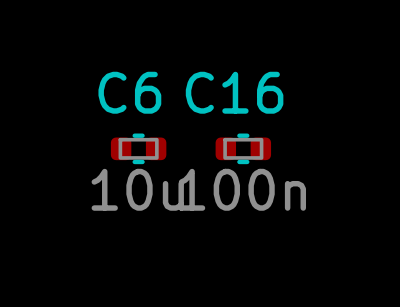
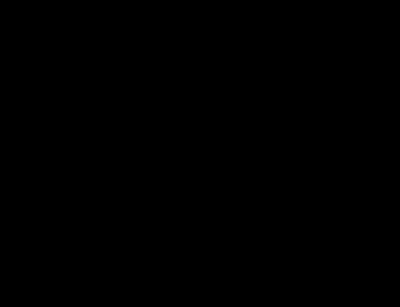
C6: 10u (138, 148) -> none
C16: 100n (243, 148) -> none

